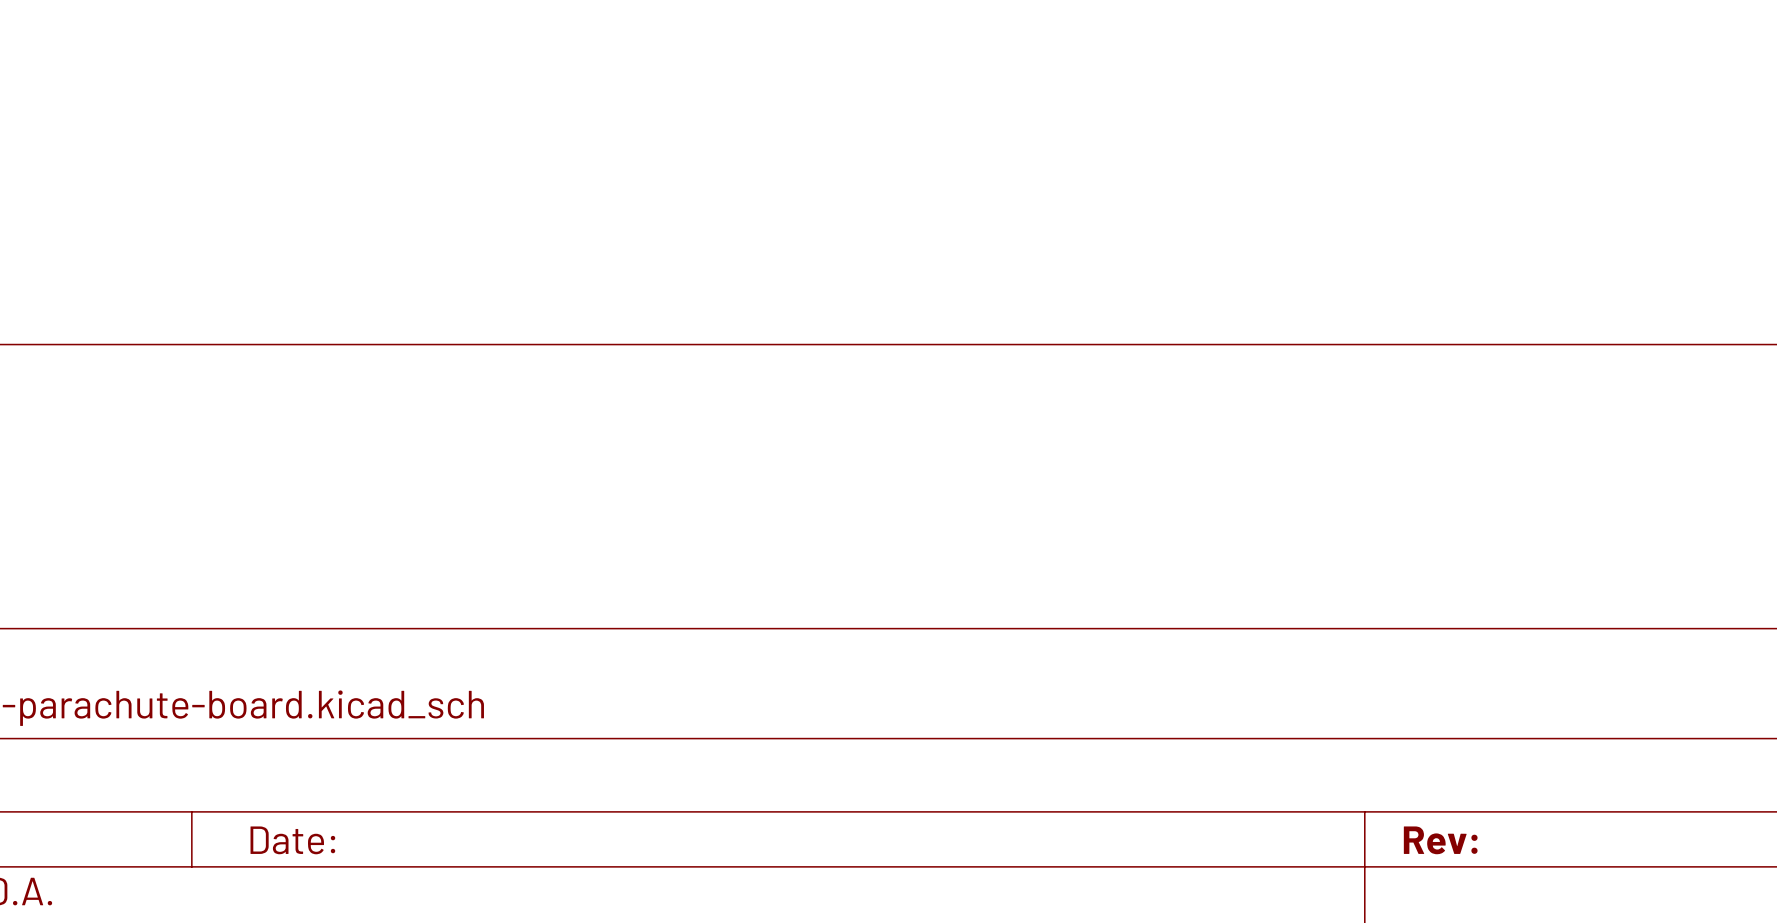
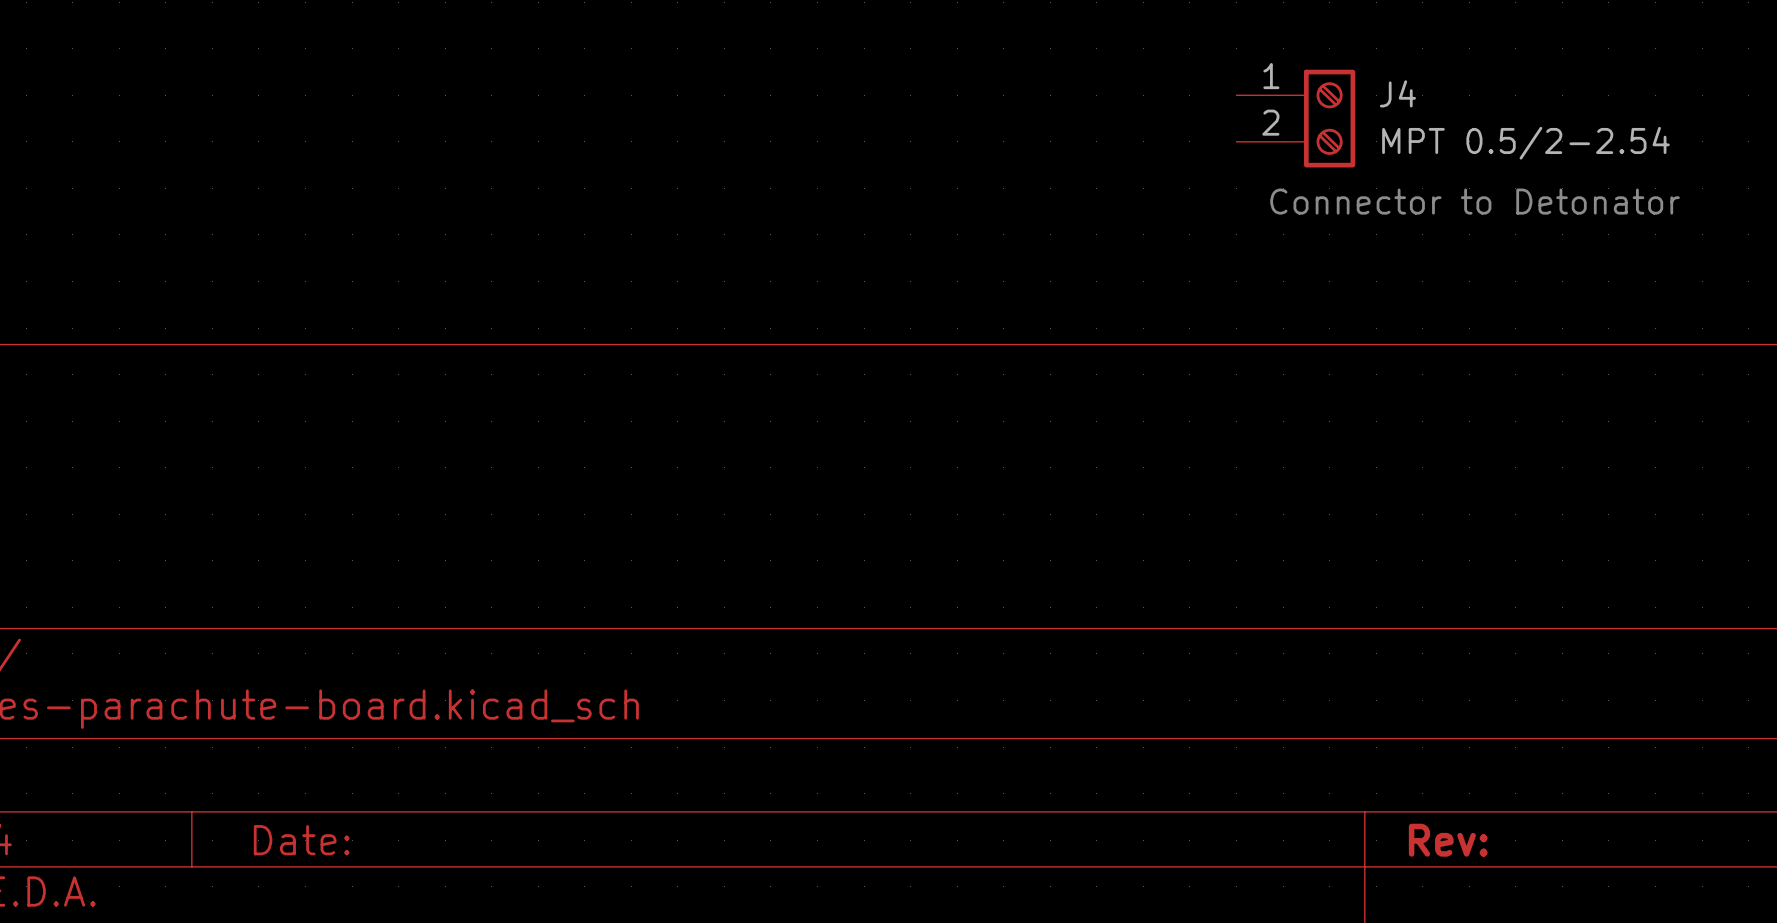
J4: none -> MPT 0.5/2-2.54 (1295, 118)
text: none -> Connector to Detonator (1475, 201)

